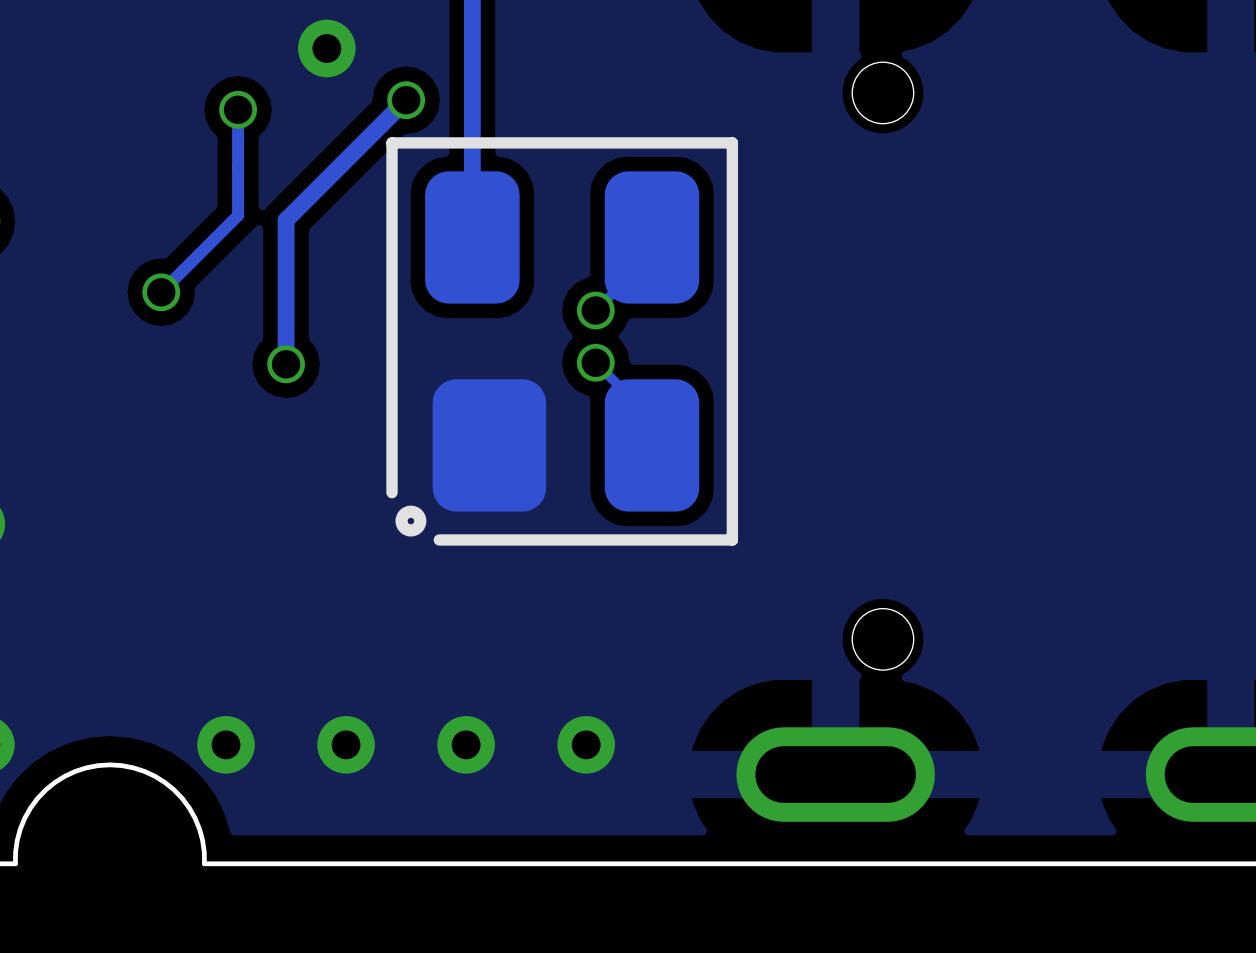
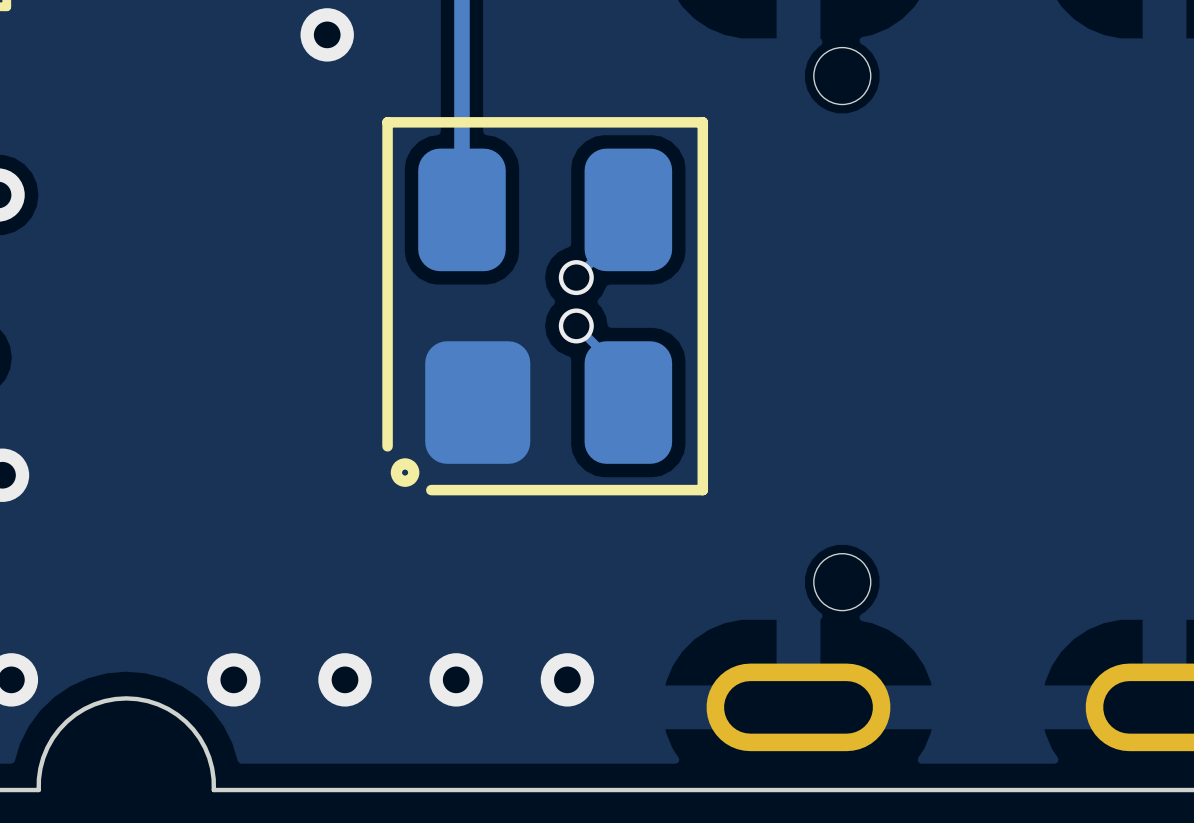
track: (406, 100) (286, 220) (286, 364) -> none
via: (406, 100) -> none
track: (238, 109) (238, 215) (161, 292) -> none
via: (238, 109) -> none
via: (161, 292) -> none
via: (286, 364) -> none

